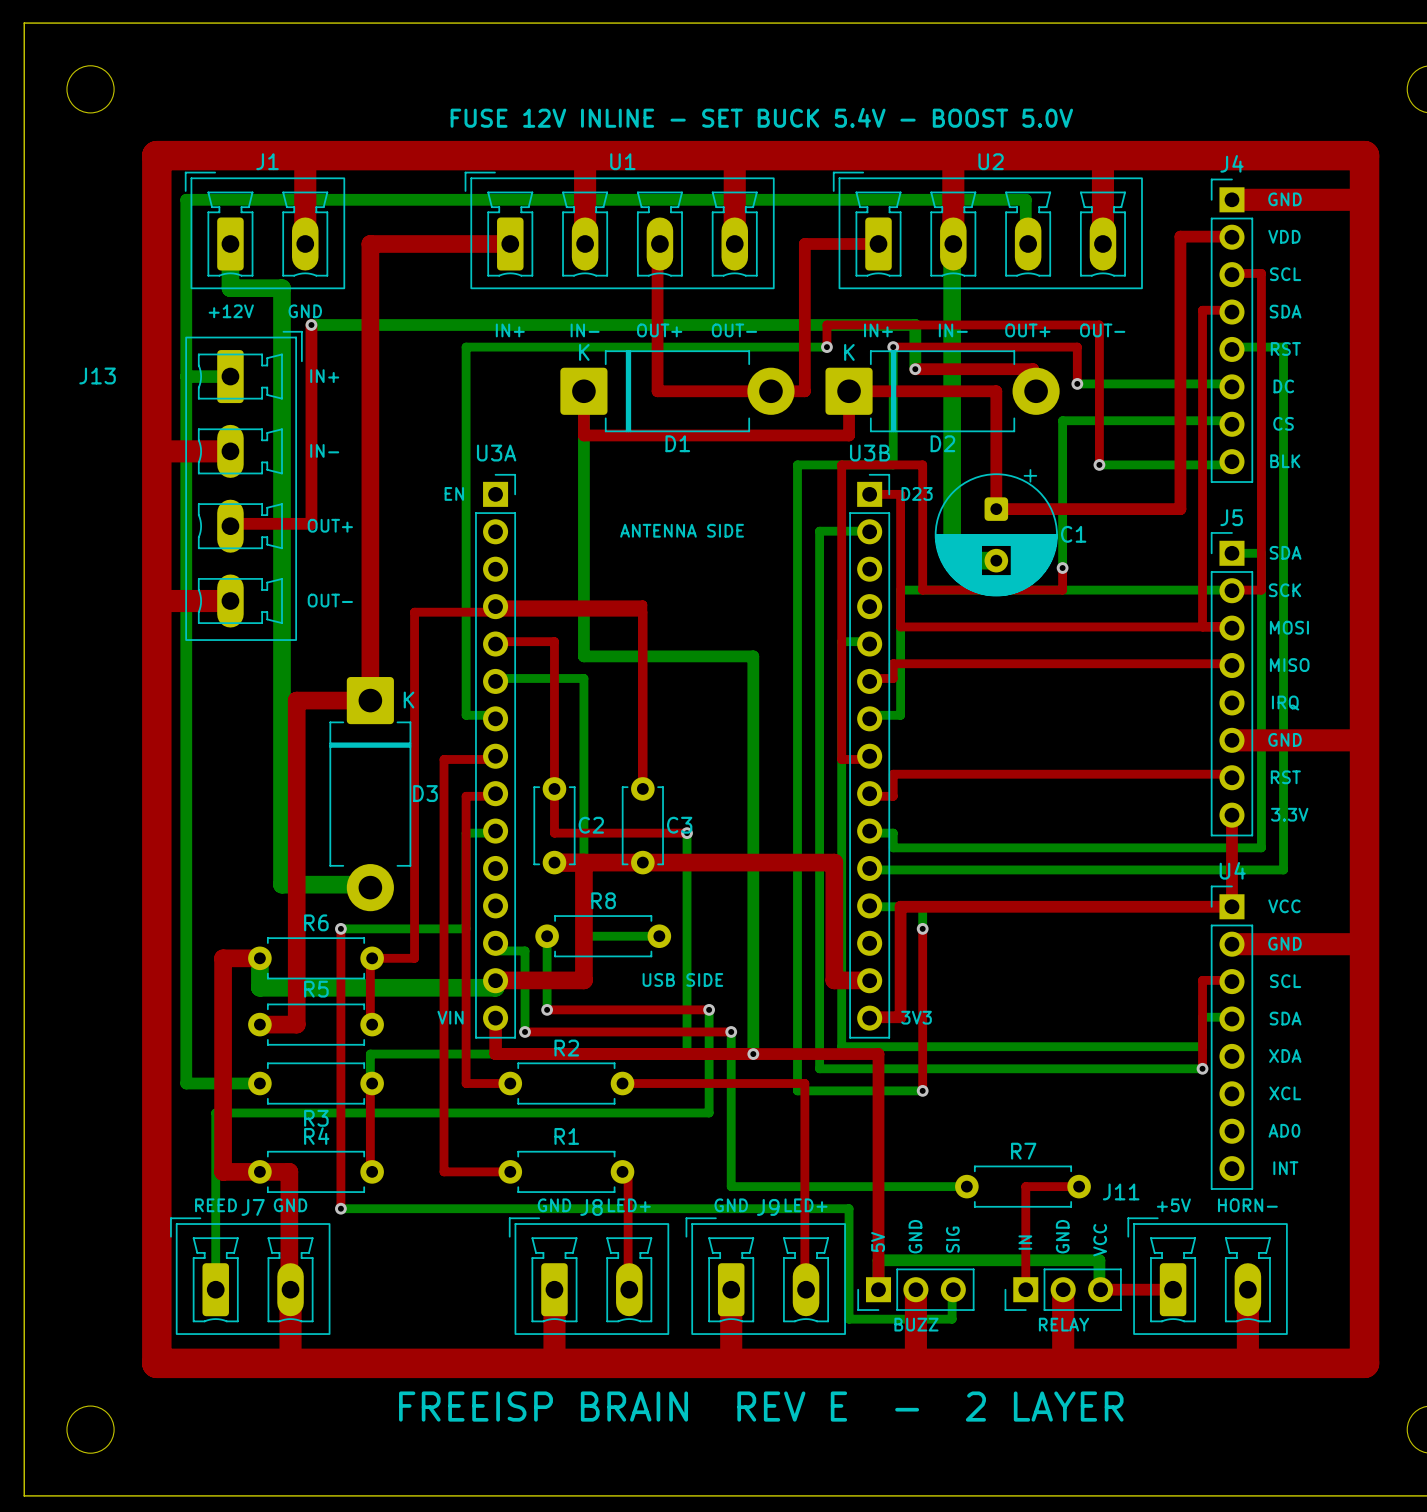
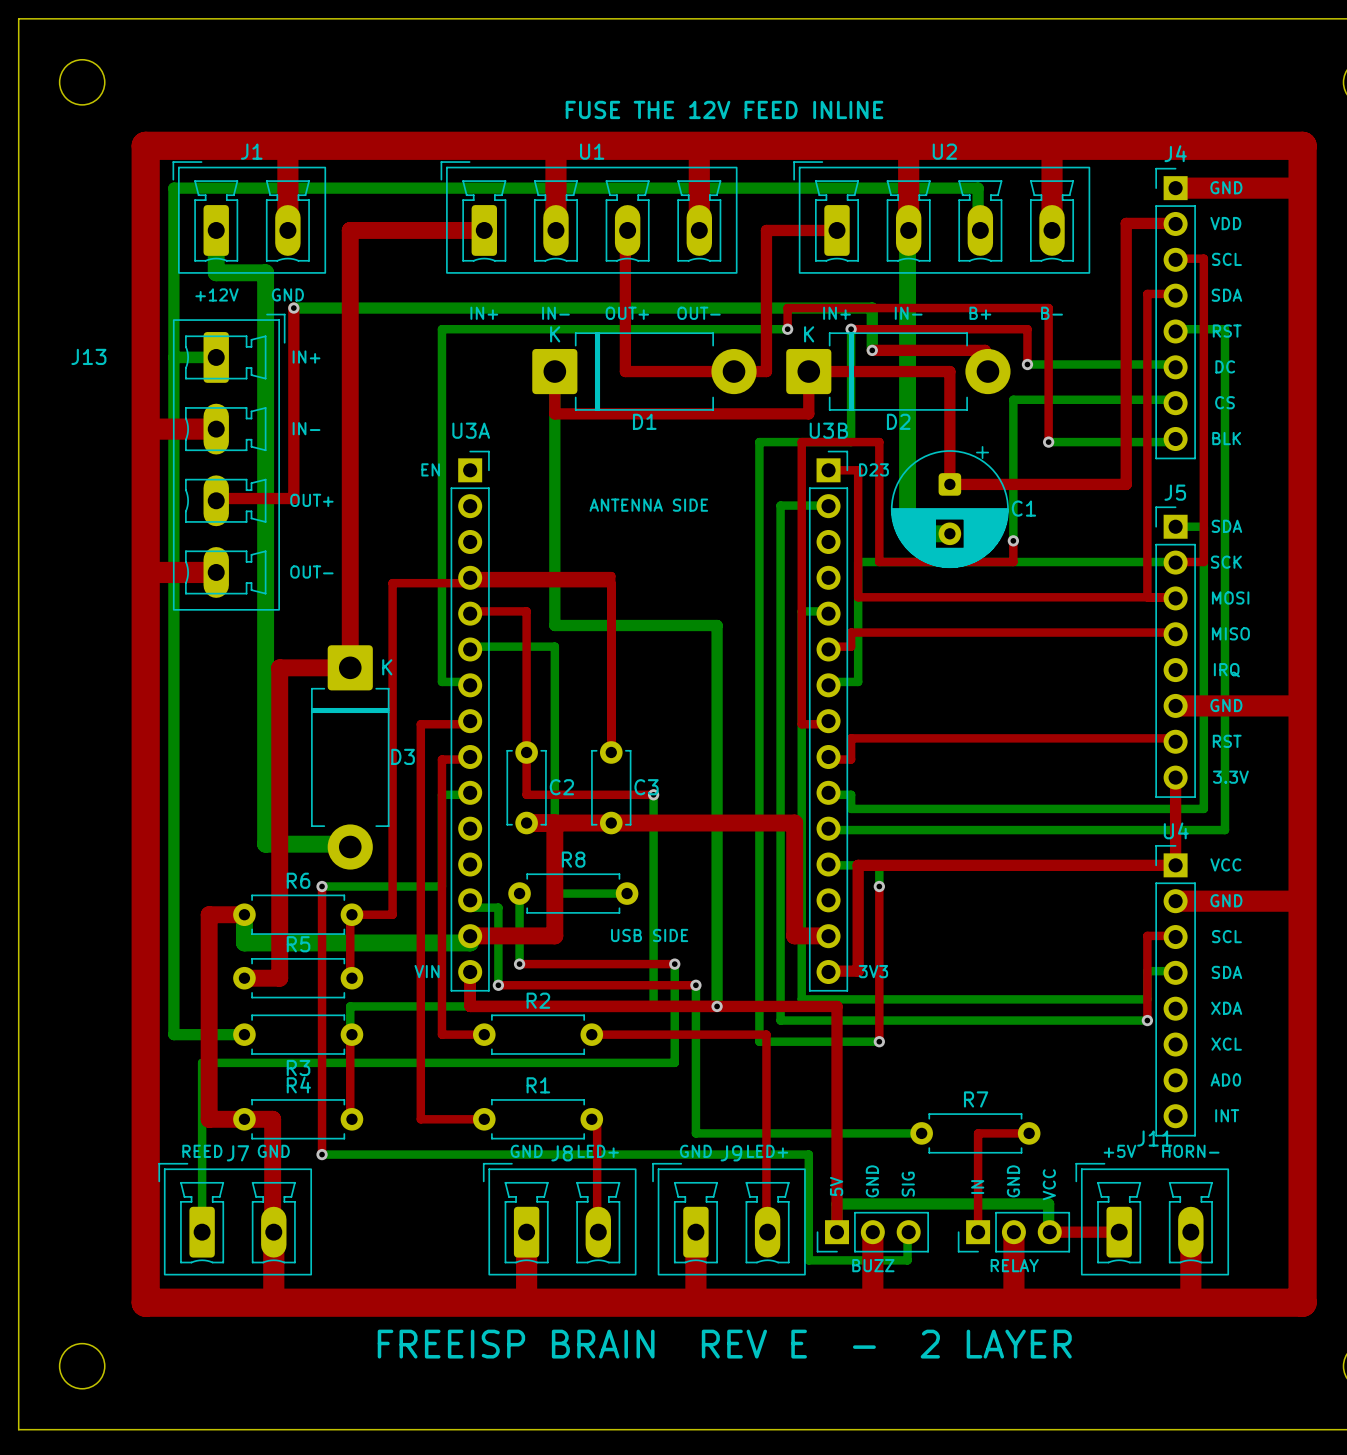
text: FUSE 12V INLINE - SET BUCK 5.4V - BOOST 5.0V (761, 117) -> FUSE THE 12V FEED INLINE (724, 109)
text: OUT+ (1027, 330) -> B+ (980, 313)
text: OUT- (1102, 330) -> B- (1052, 313)
J11 name position: J11 (1121, 1191) -> J11 (1154, 1138)

